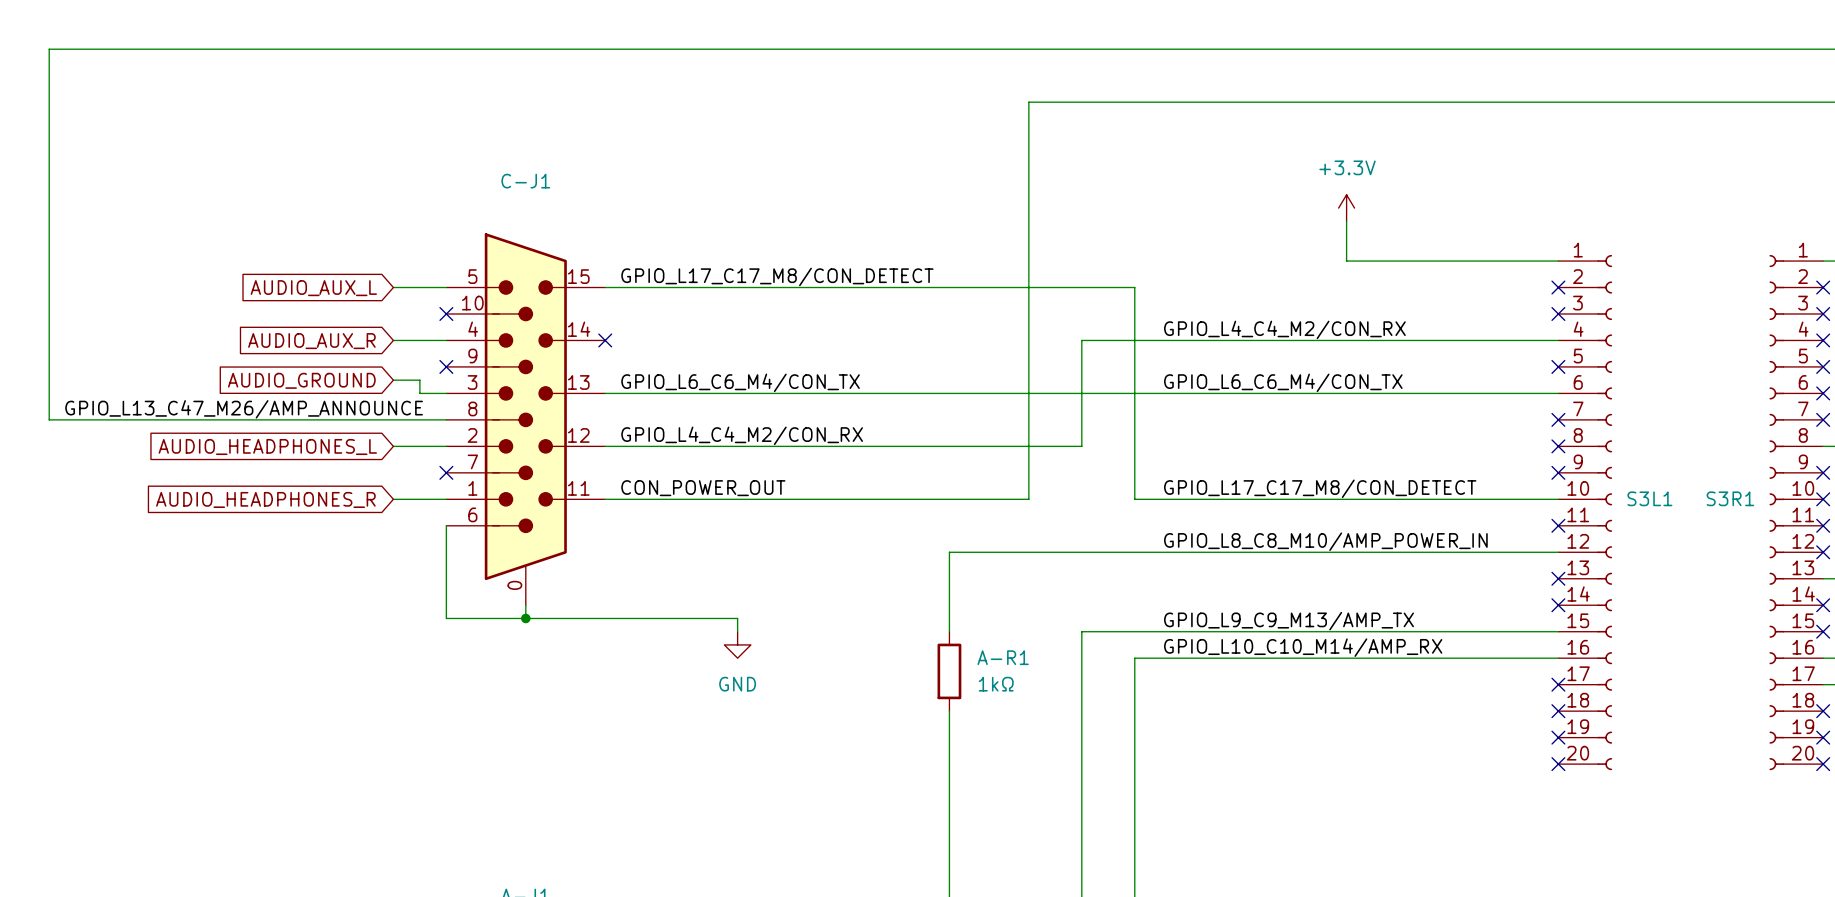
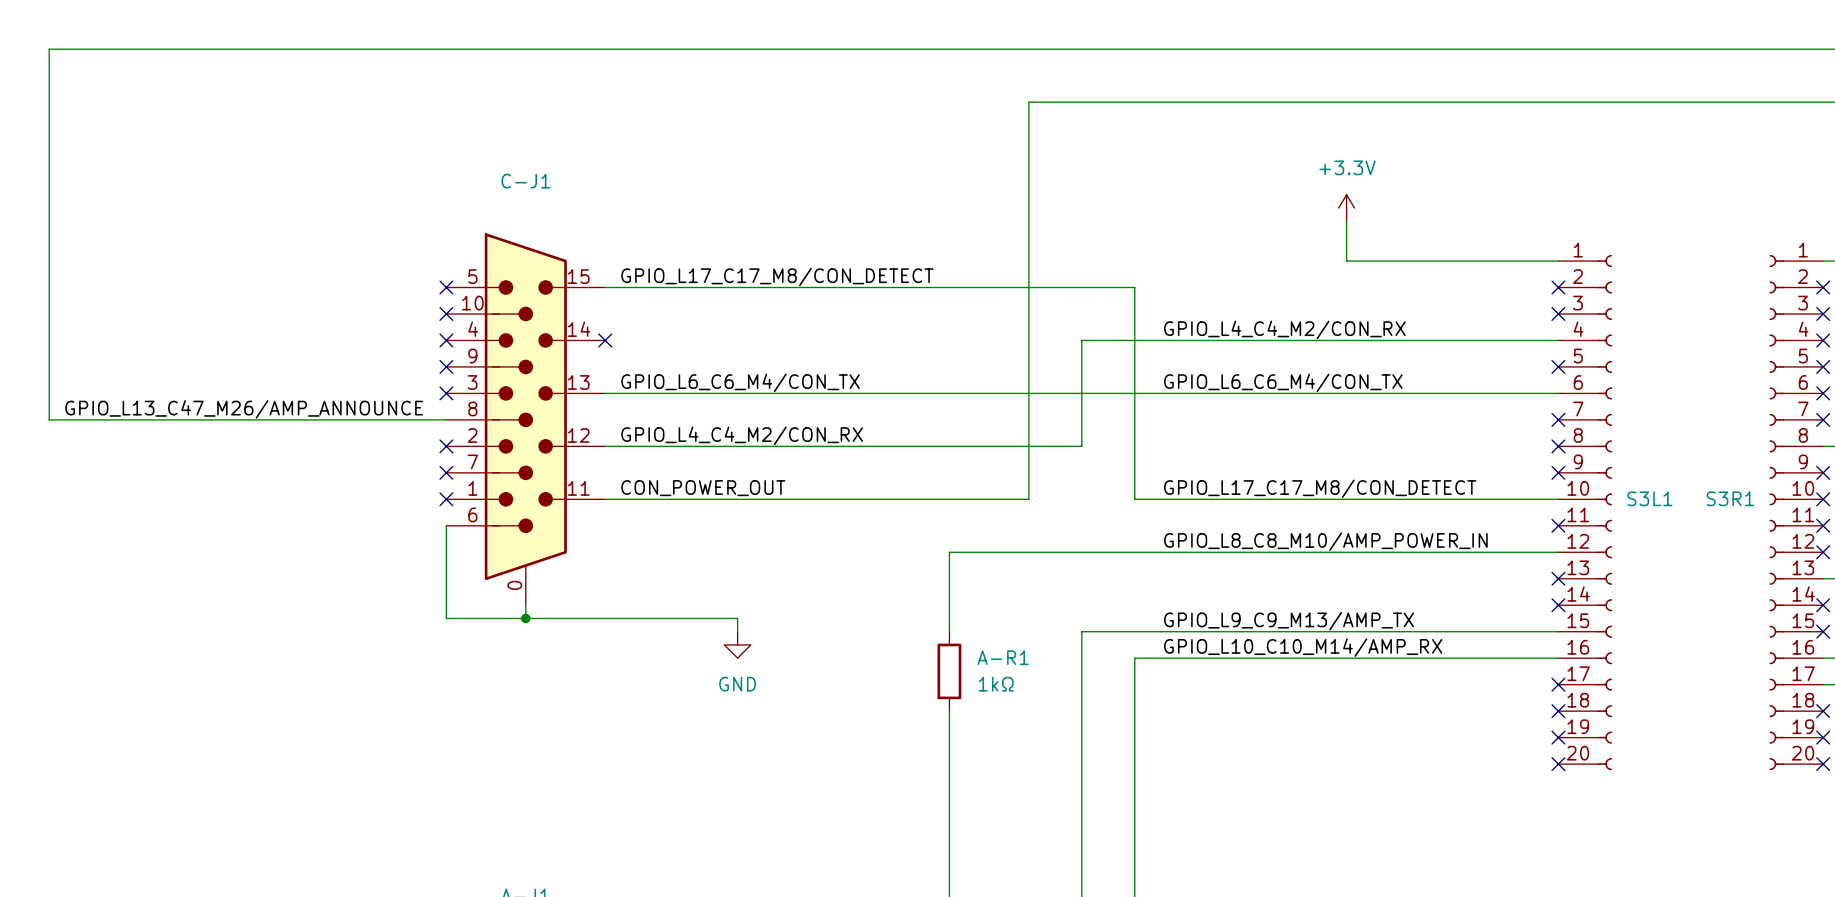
wire: (393, 287) (446, 287) -> none
no-connect mark: none -> (446, 287)
global label: AUDIO_AUX_L (313, 288) -> none
wire: (393, 340) (446, 340) -> none
no-connect mark: none -> (446, 340)
global label: AUDIO_AUX_R (311, 341) -> none
global label: AUDIO_GROUND (301, 380) -> none
wire: (393, 380) (419, 380) (419, 393) (446, 393) -> none
no-connect mark: none -> (446, 393)
wire: (393, 446) (446, 446) -> none
no-connect mark: none -> (446, 446)
global label: AUDIO_HEADPHONES_L (267, 447) -> none
global label: AUDIO_HEADPHONES_R (265, 499) -> none
wire: (393, 499) (446, 499) -> none
no-connect mark: none -> (446, 499)

